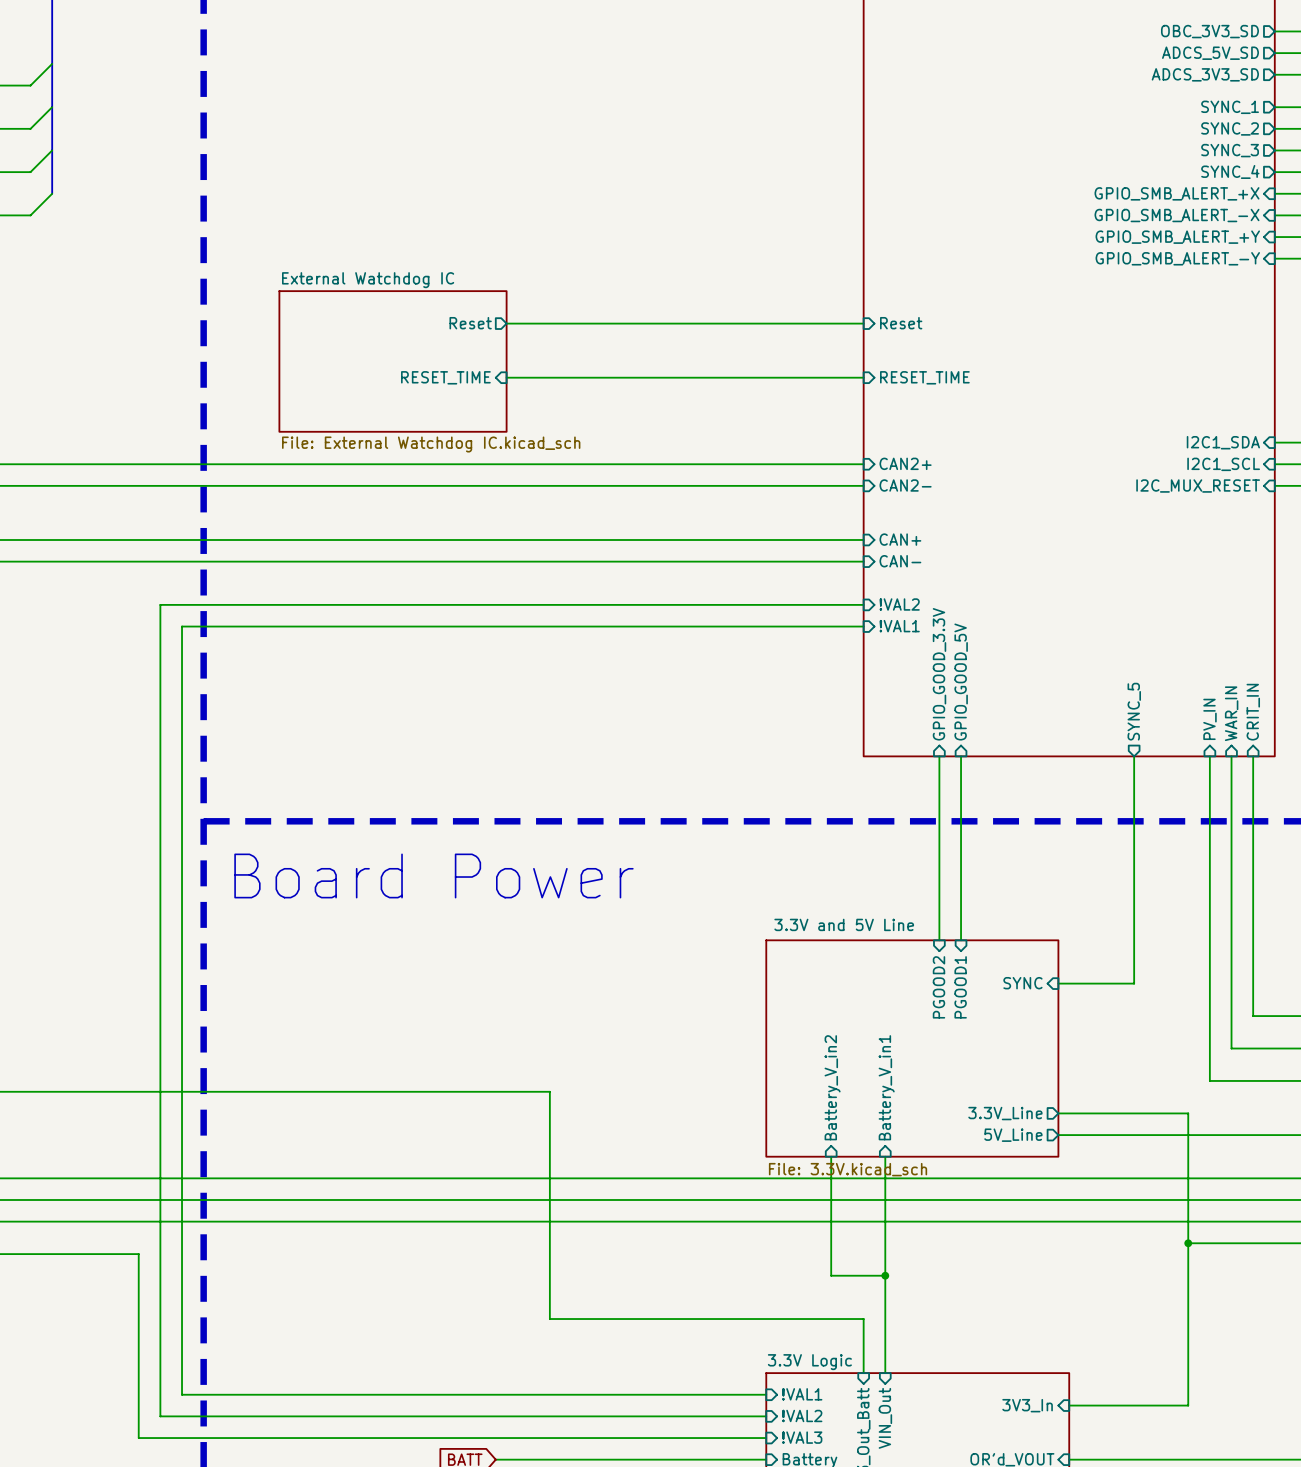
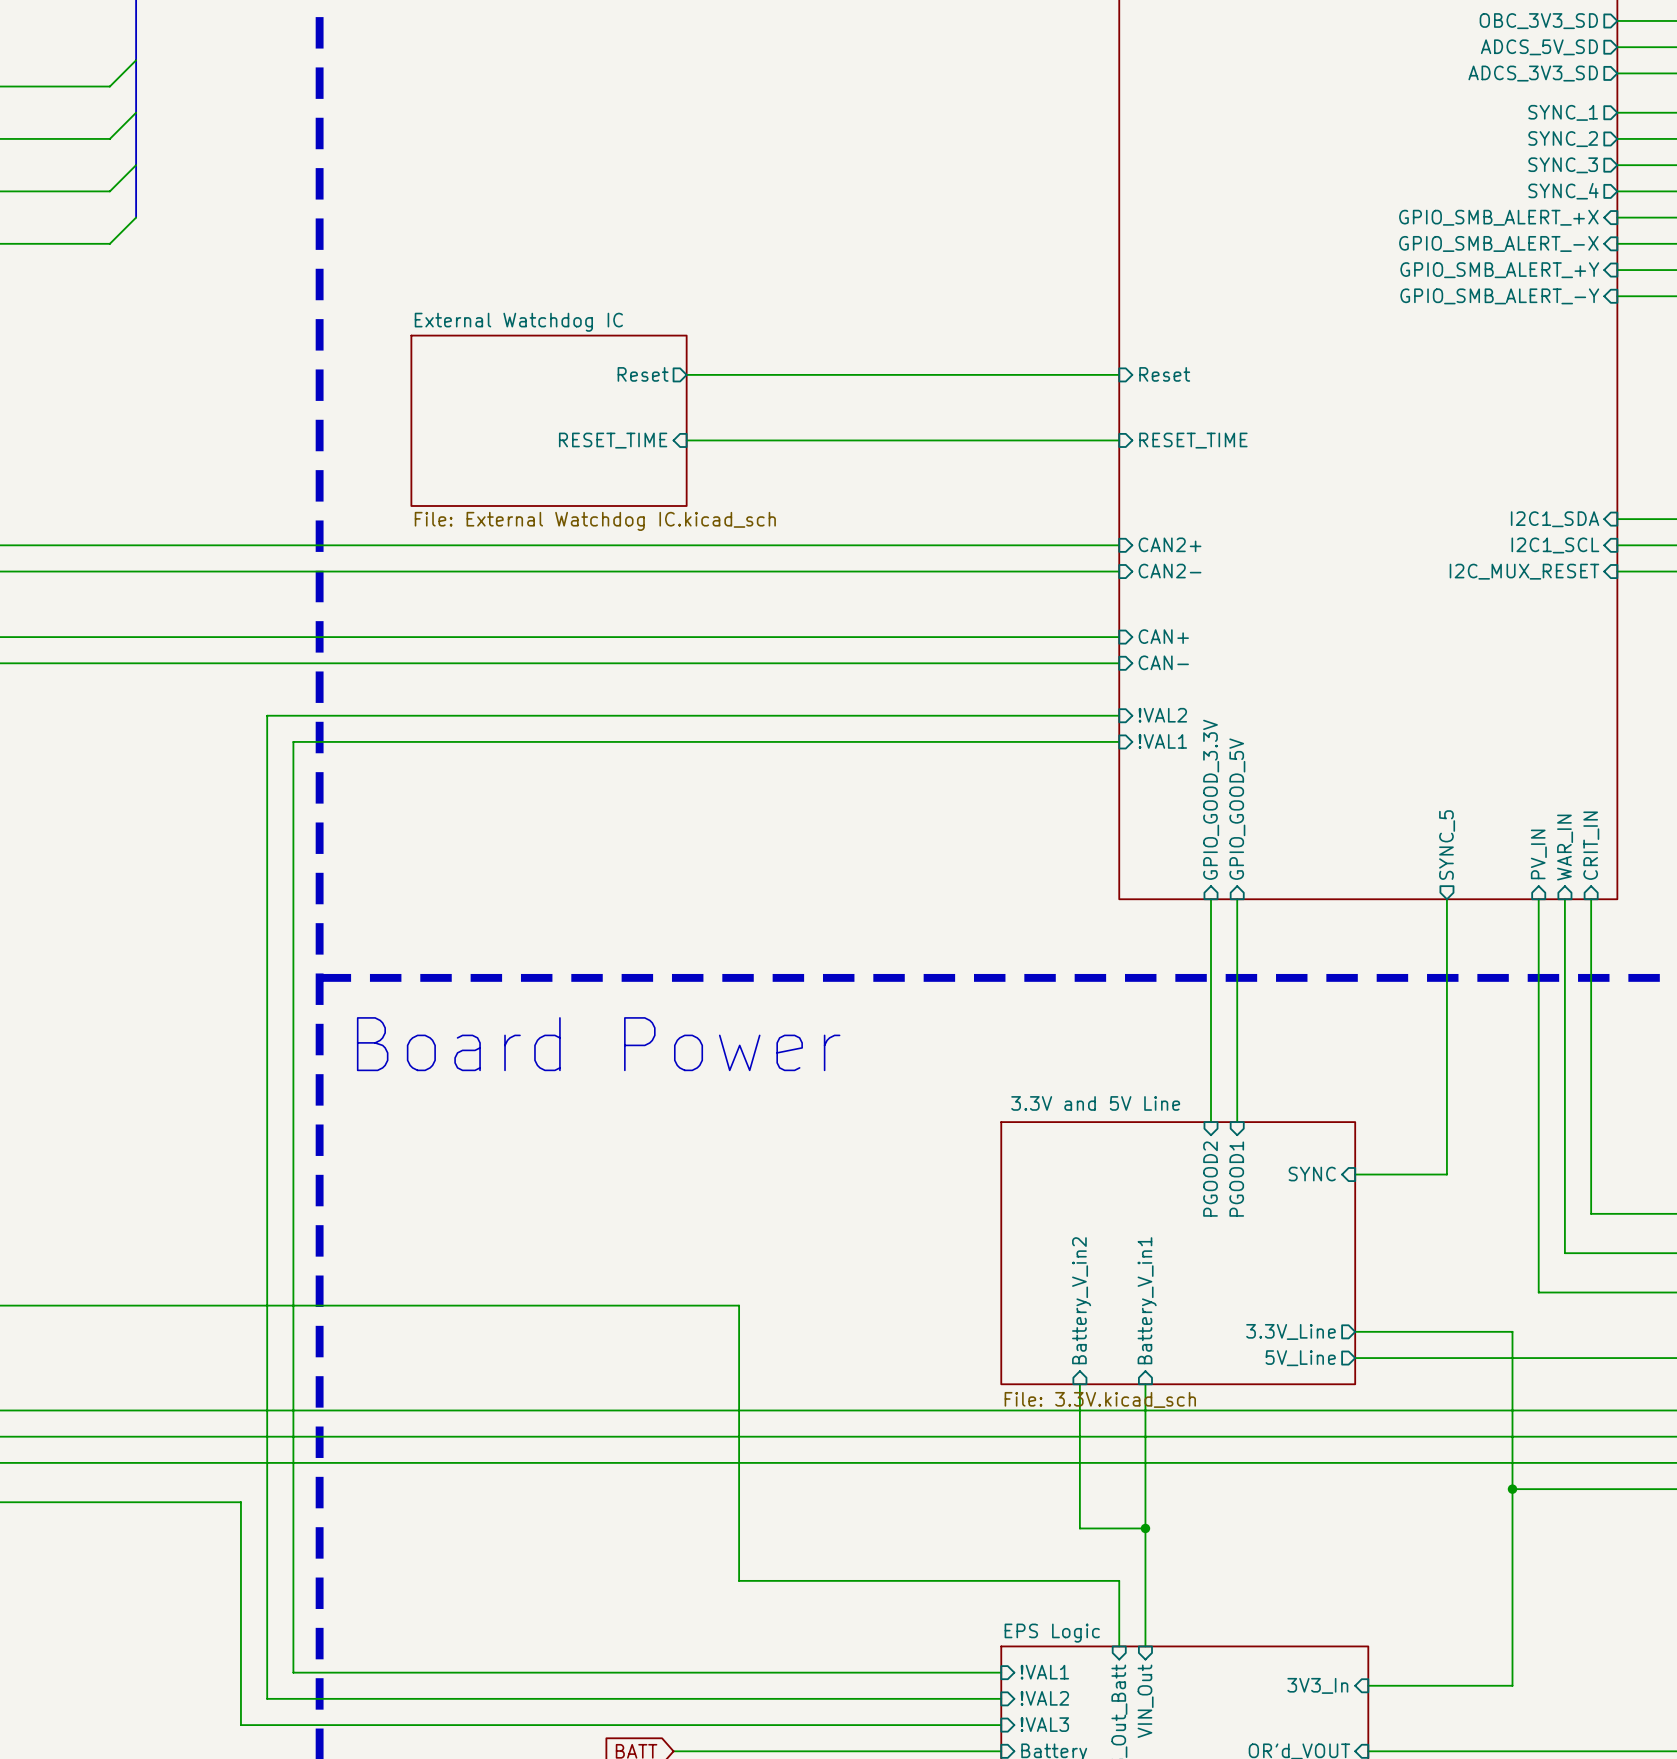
sheet 3.3V Logic name: 3.3V Logic (809, 1362) -> EPS Logic (1052, 1633)

